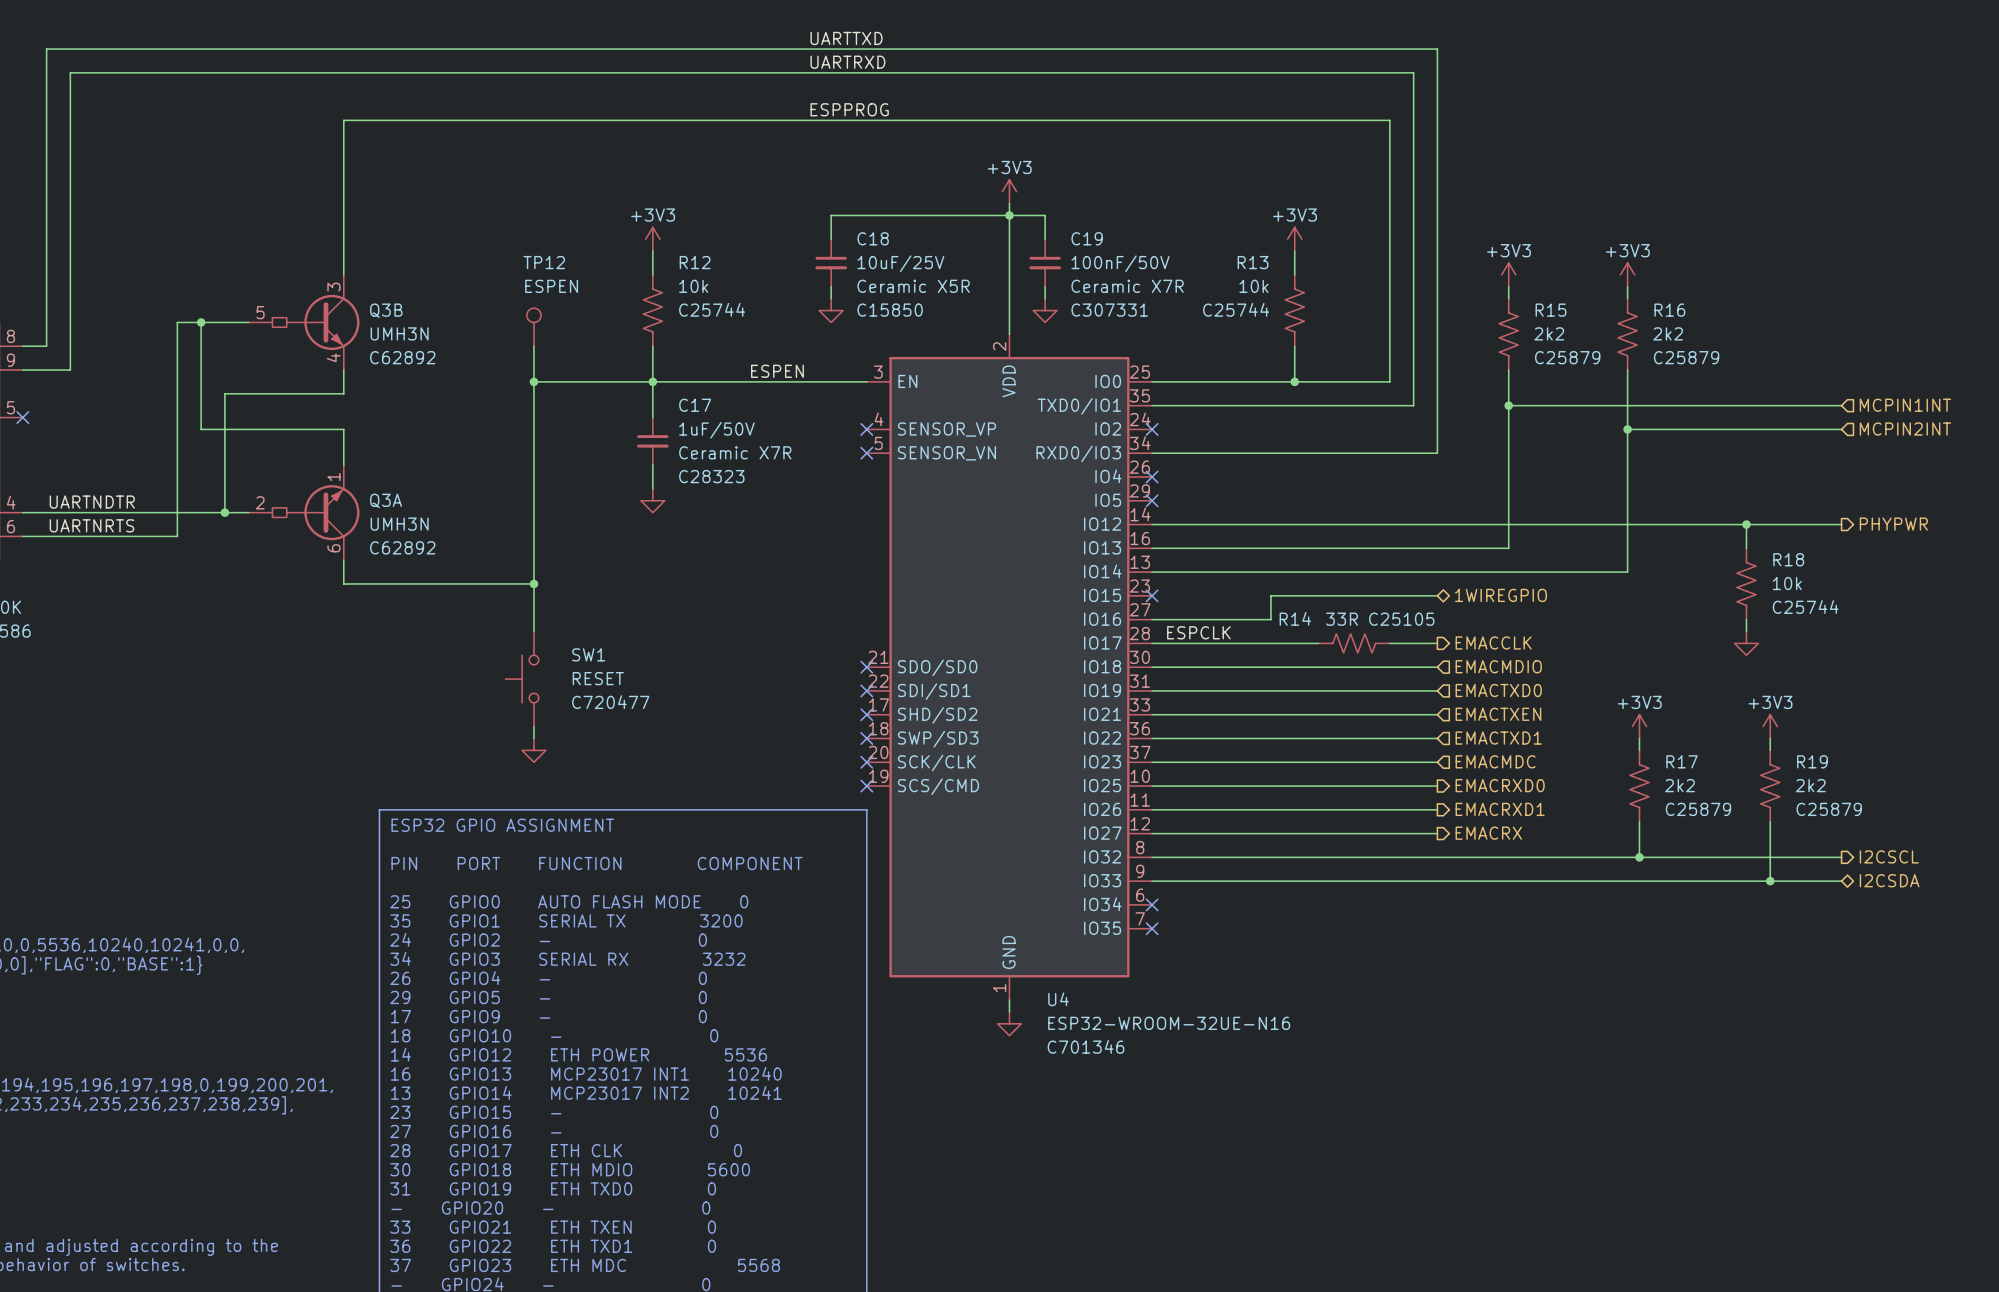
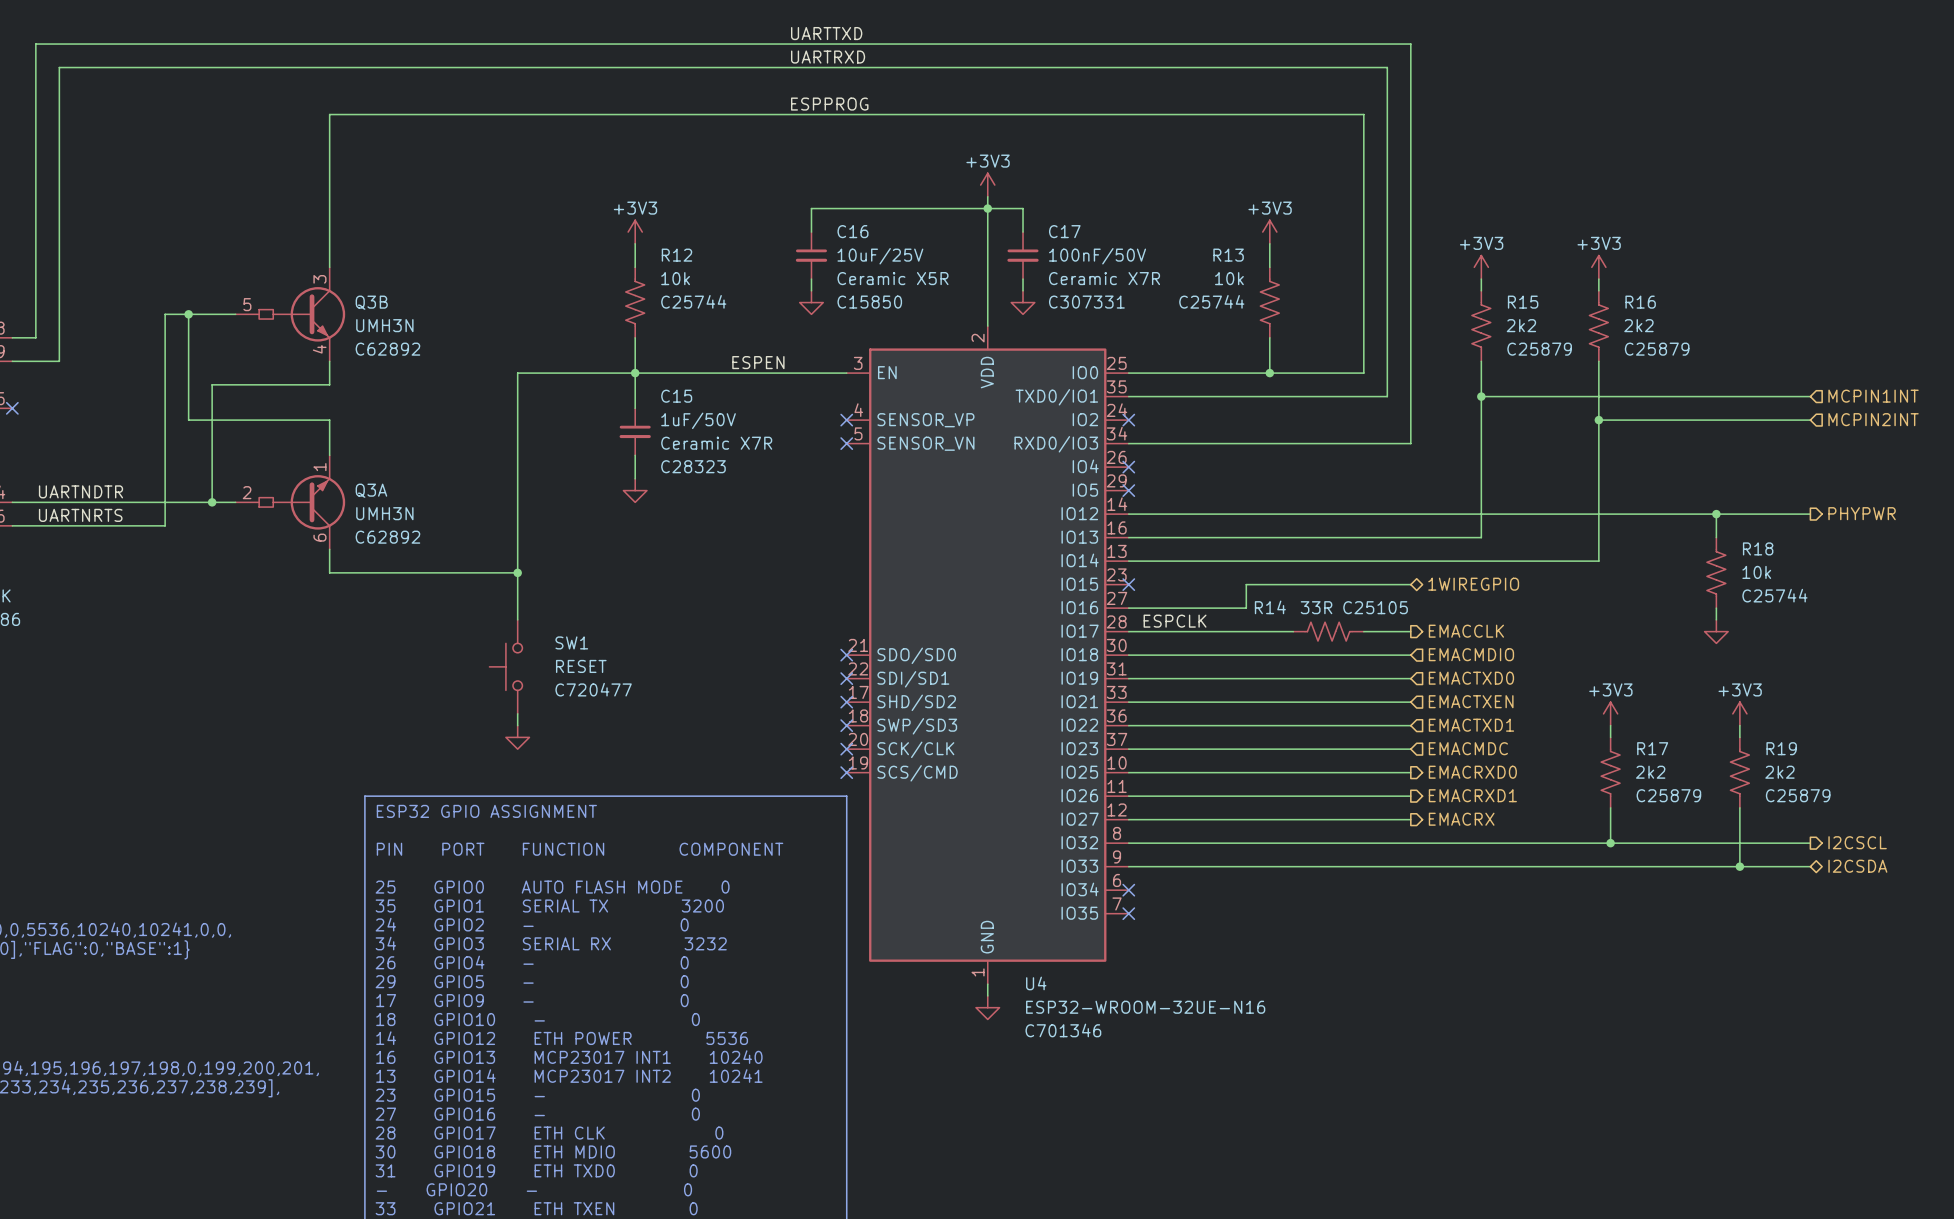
C18 name: C18 (873, 238) -> C16 (852, 231)
C19 name: C19 (1087, 238) -> C17 (1064, 231)
TP12: ESPEN (533, 327) -> none
wire: (533, 346) (533, 381) -> none
junction: (533, 381) -> none
C17 name: C17 (695, 405) -> C15 (676, 396)

